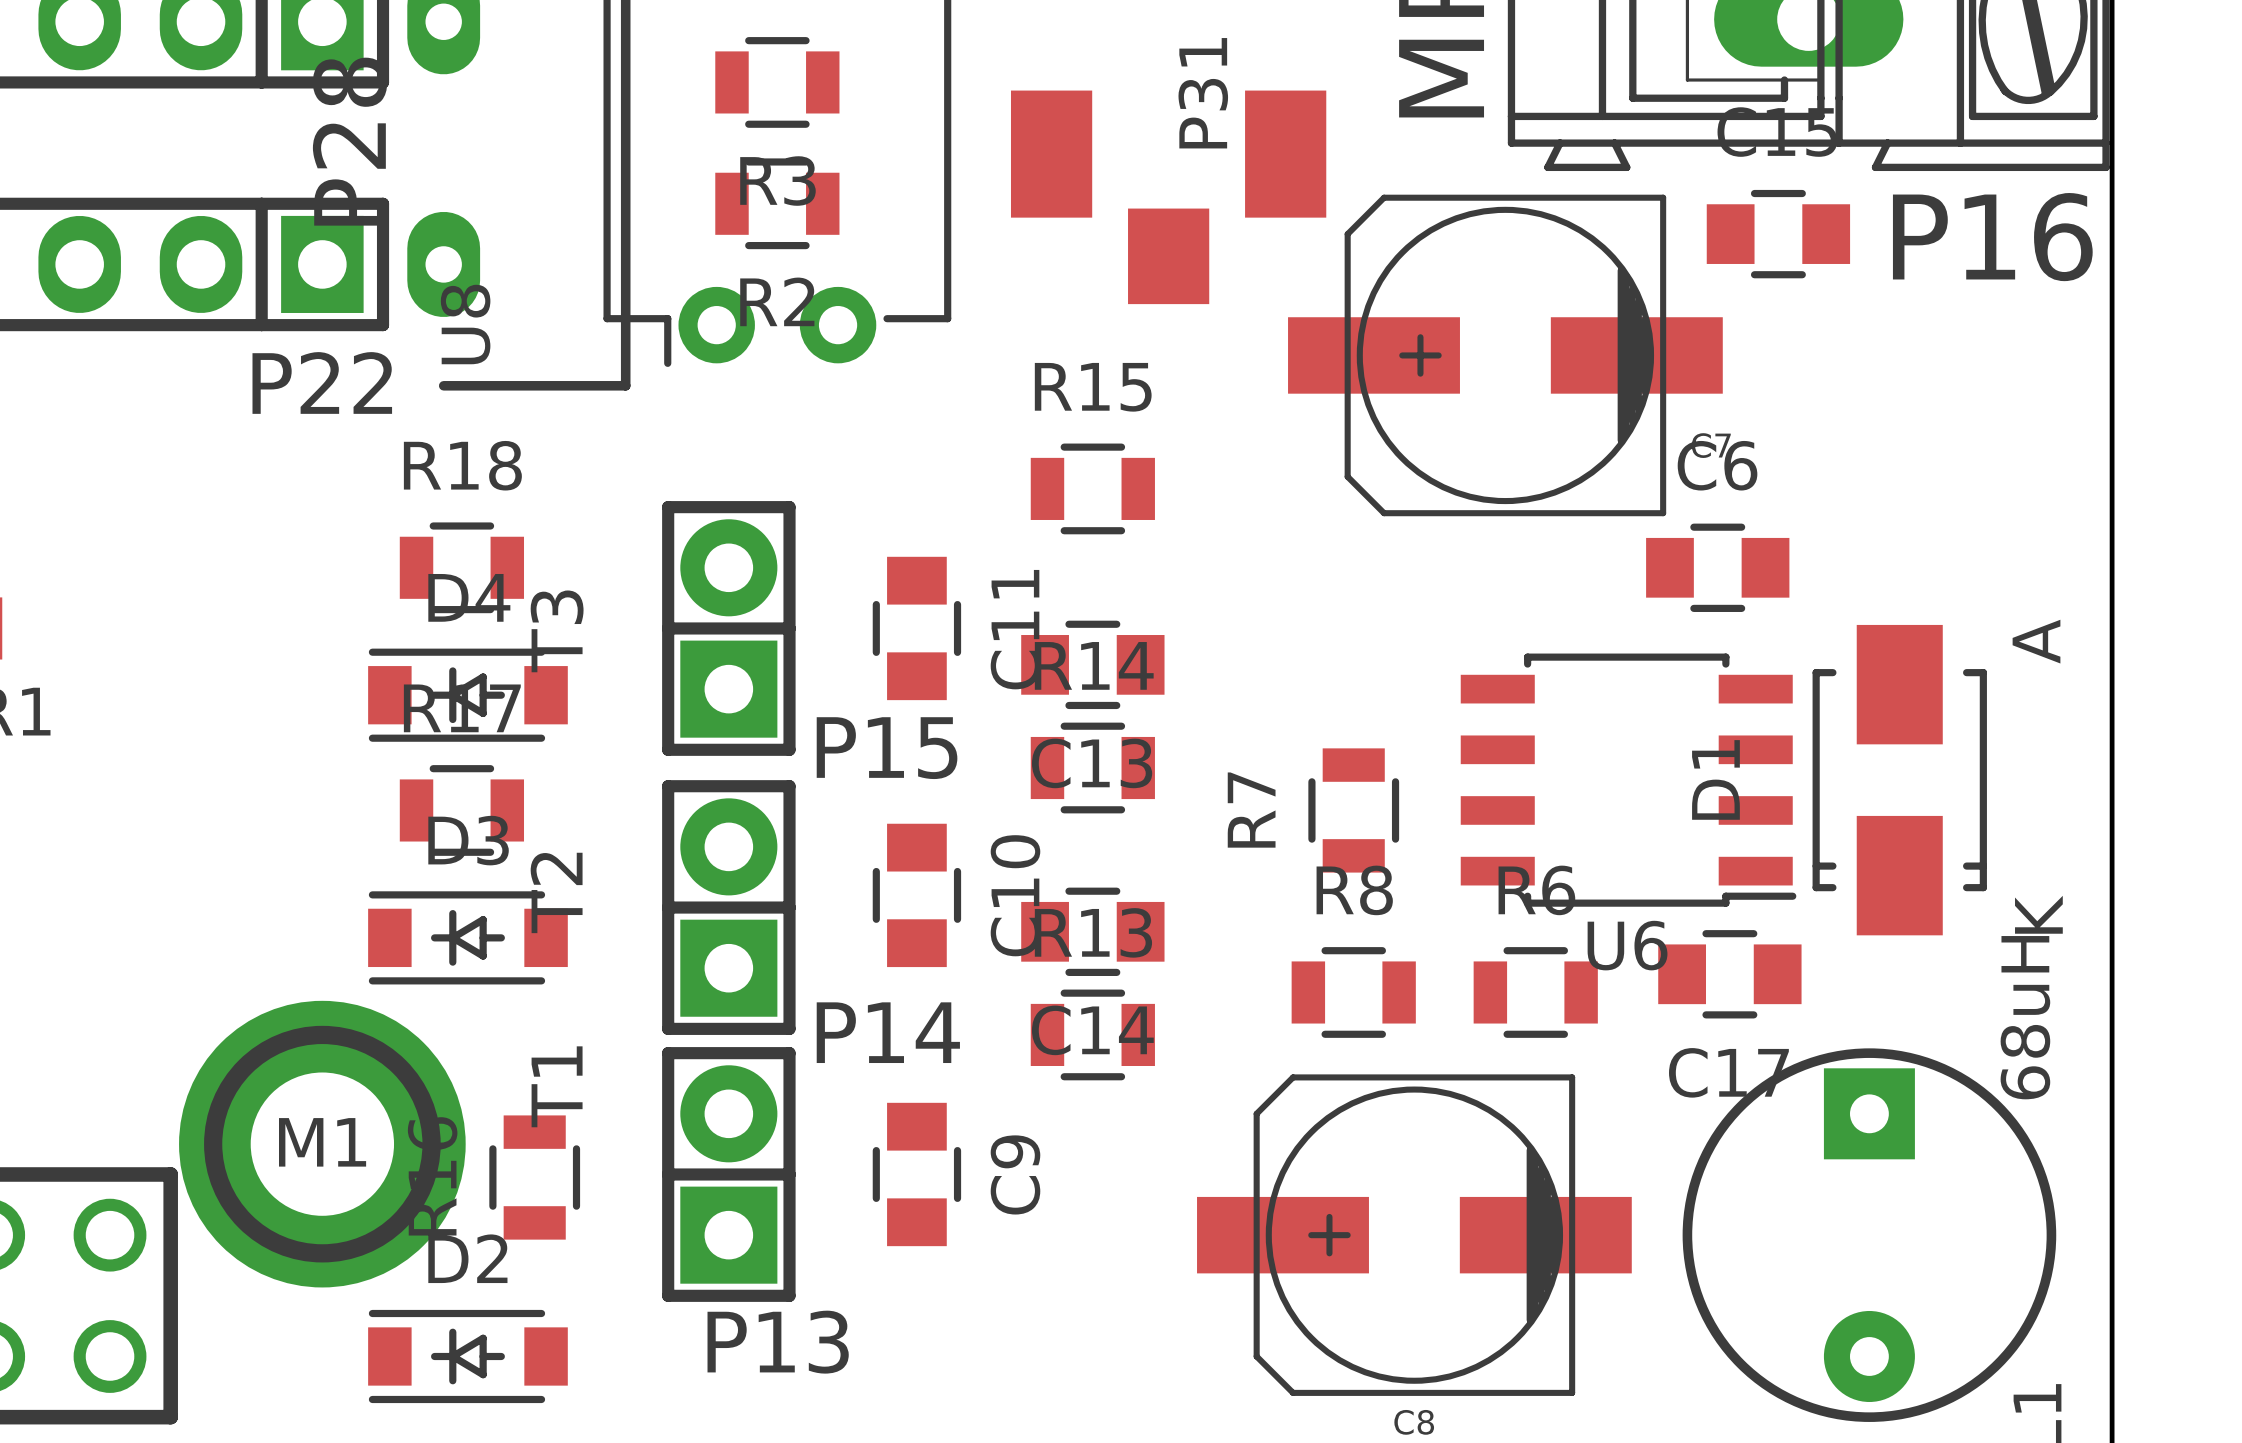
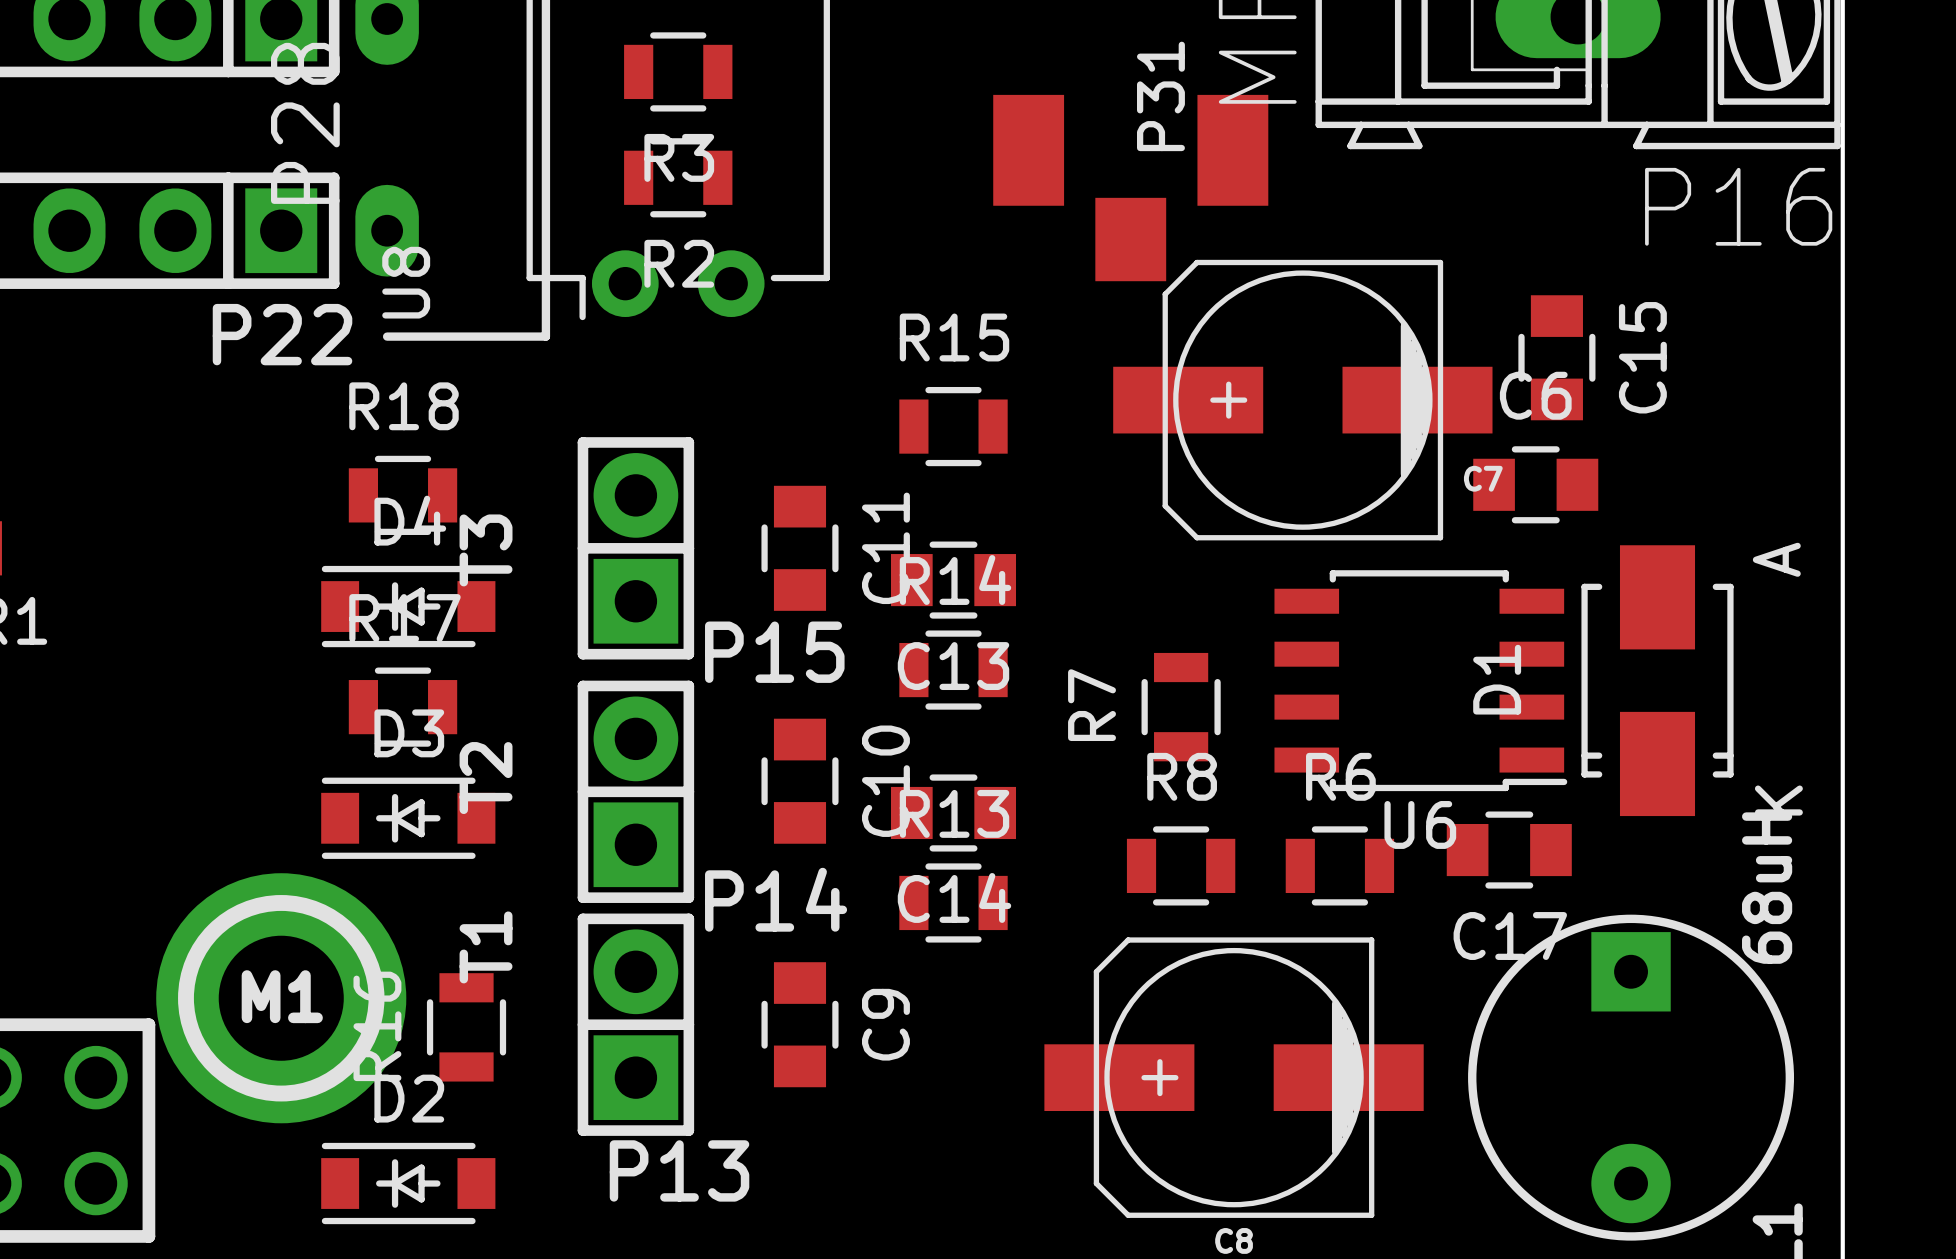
P31 position: (1168, 197) -> (1130, 188)
C15 rotation: 0° (1778, 234) -> 90° clockwise (1556, 357)
C15 position: (1778, 234) -> (1556, 357)
C7 position: (1505, 355) -> (1302, 400)
C6 position: (1717, 567) -> (1535, 484)

